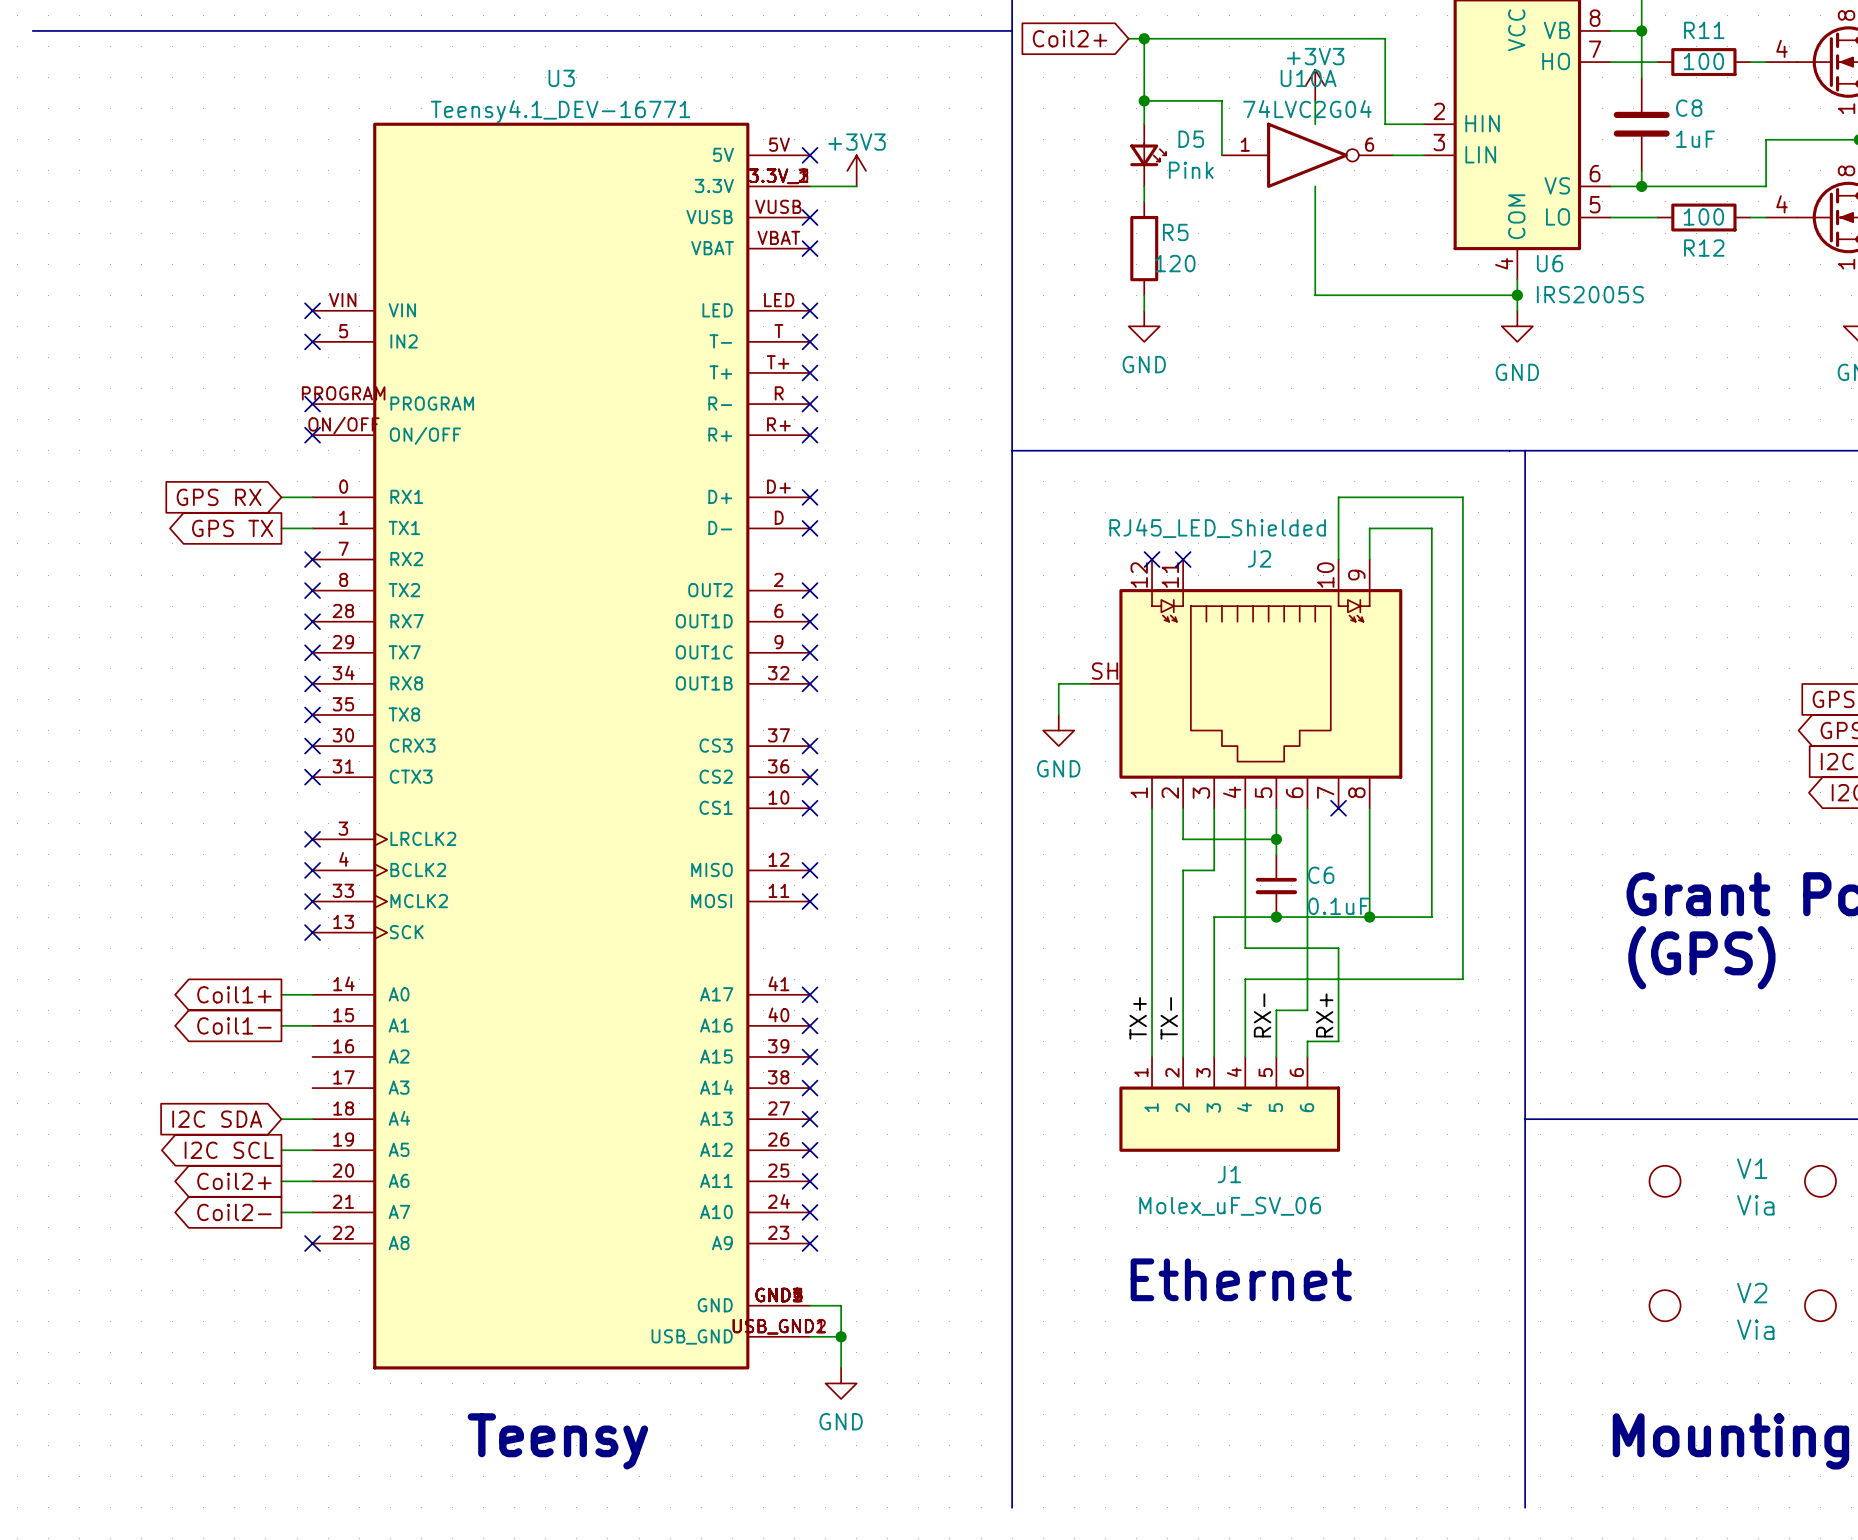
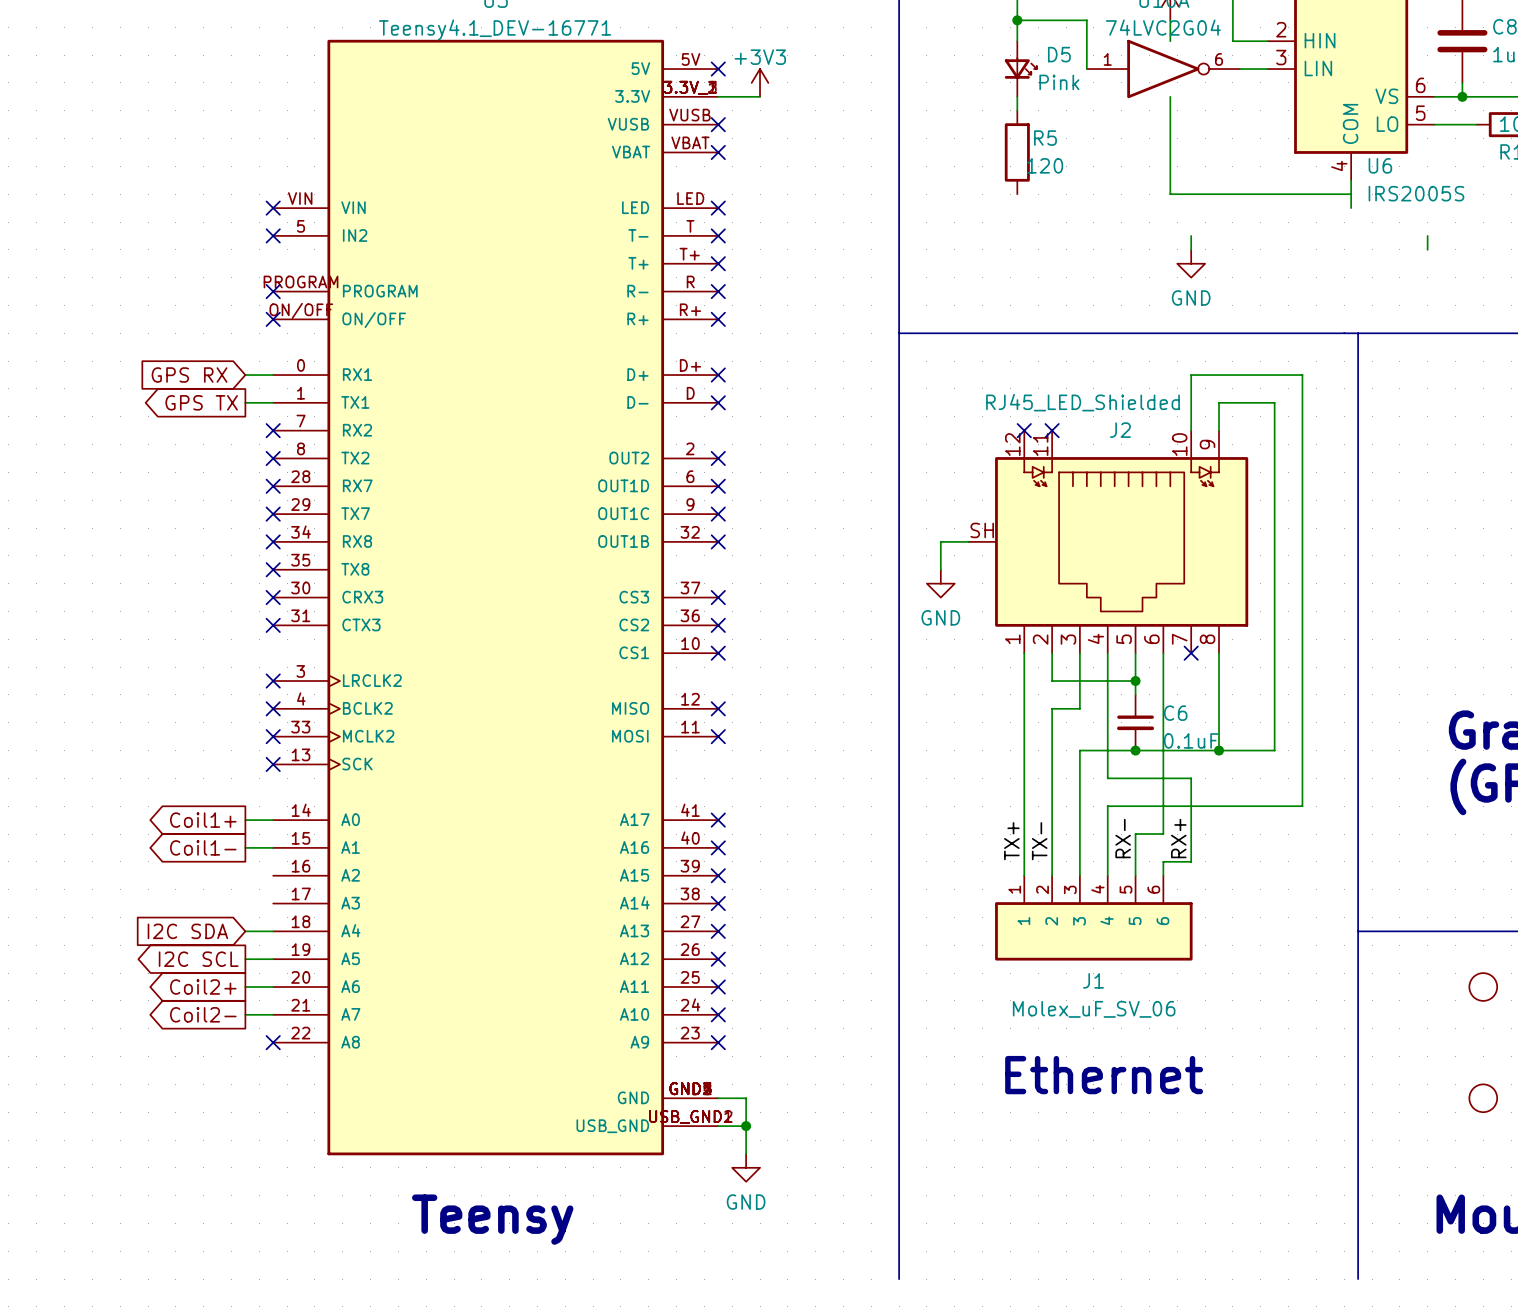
wire: (1144, 295) (1144, 310) -> (1191, 235) (1191, 249)
junction: (1517, 295) -> none
power symbol: GND (1144, 326) -> none
power symbol: GND (1517, 326) -> none
wire: none -> (1427, 235) (1427, 249)
power symbol: none -> GND (1191, 263)

